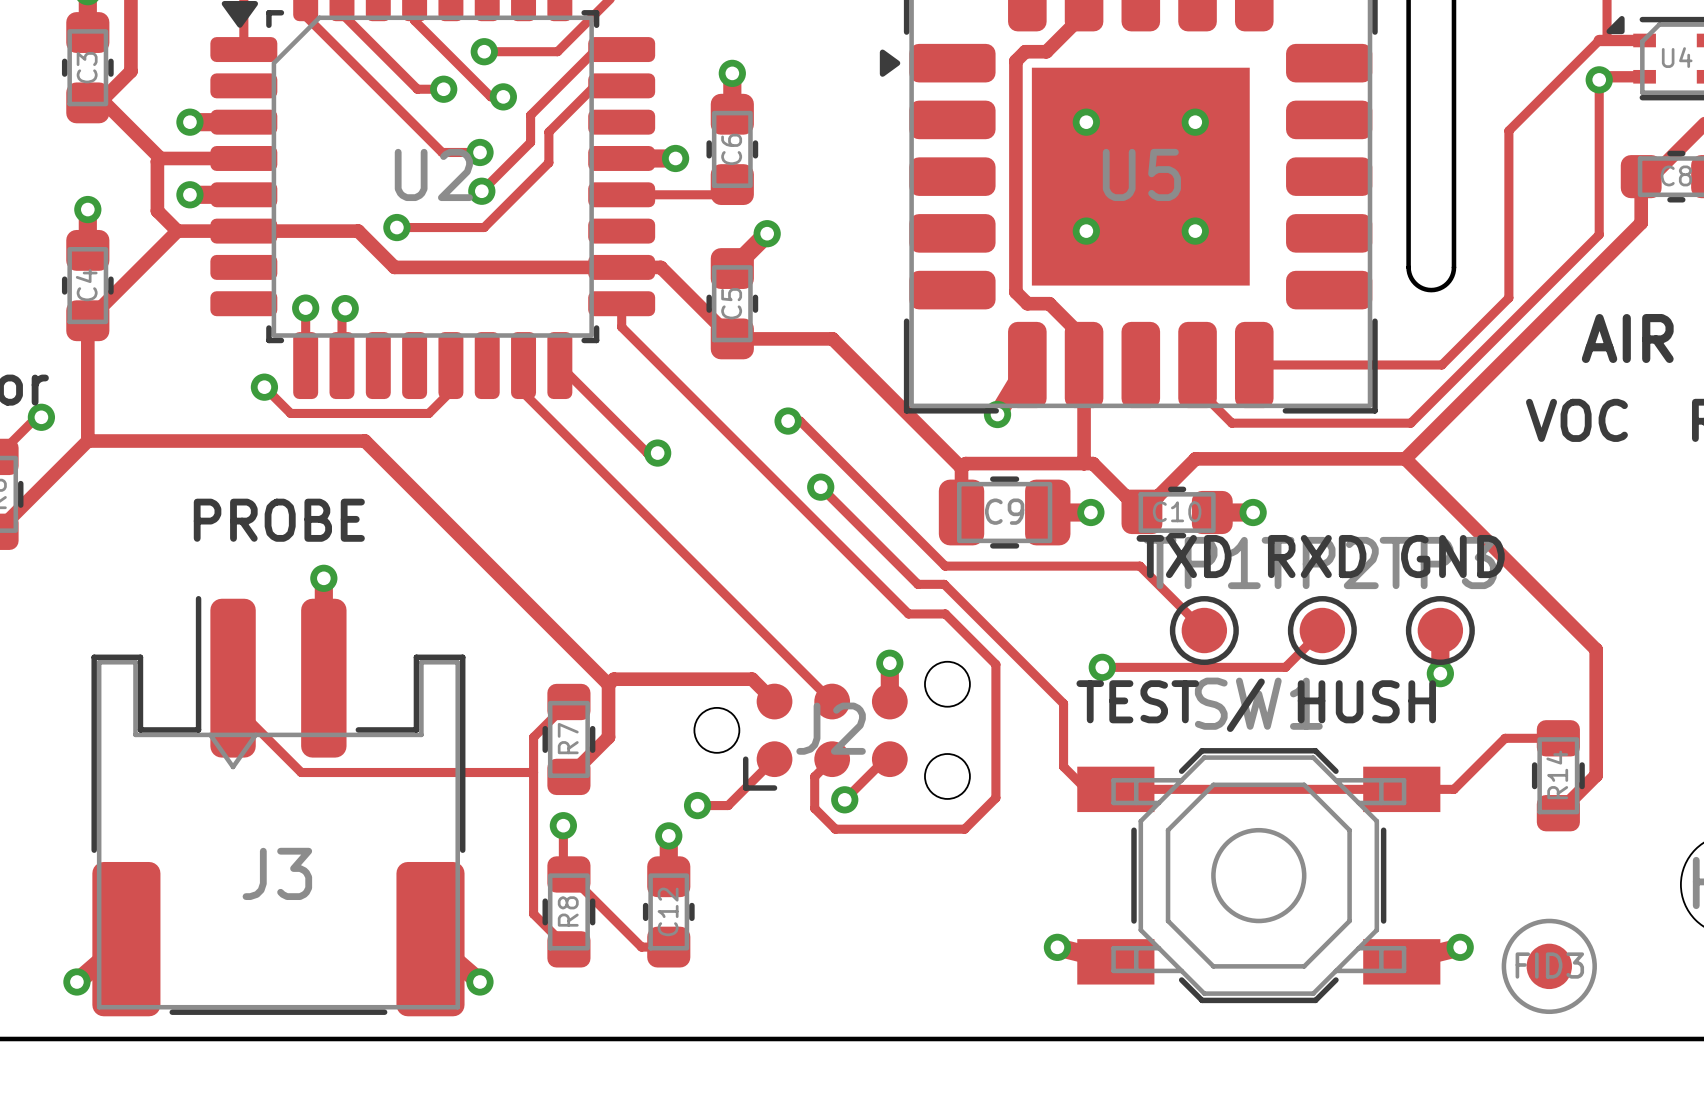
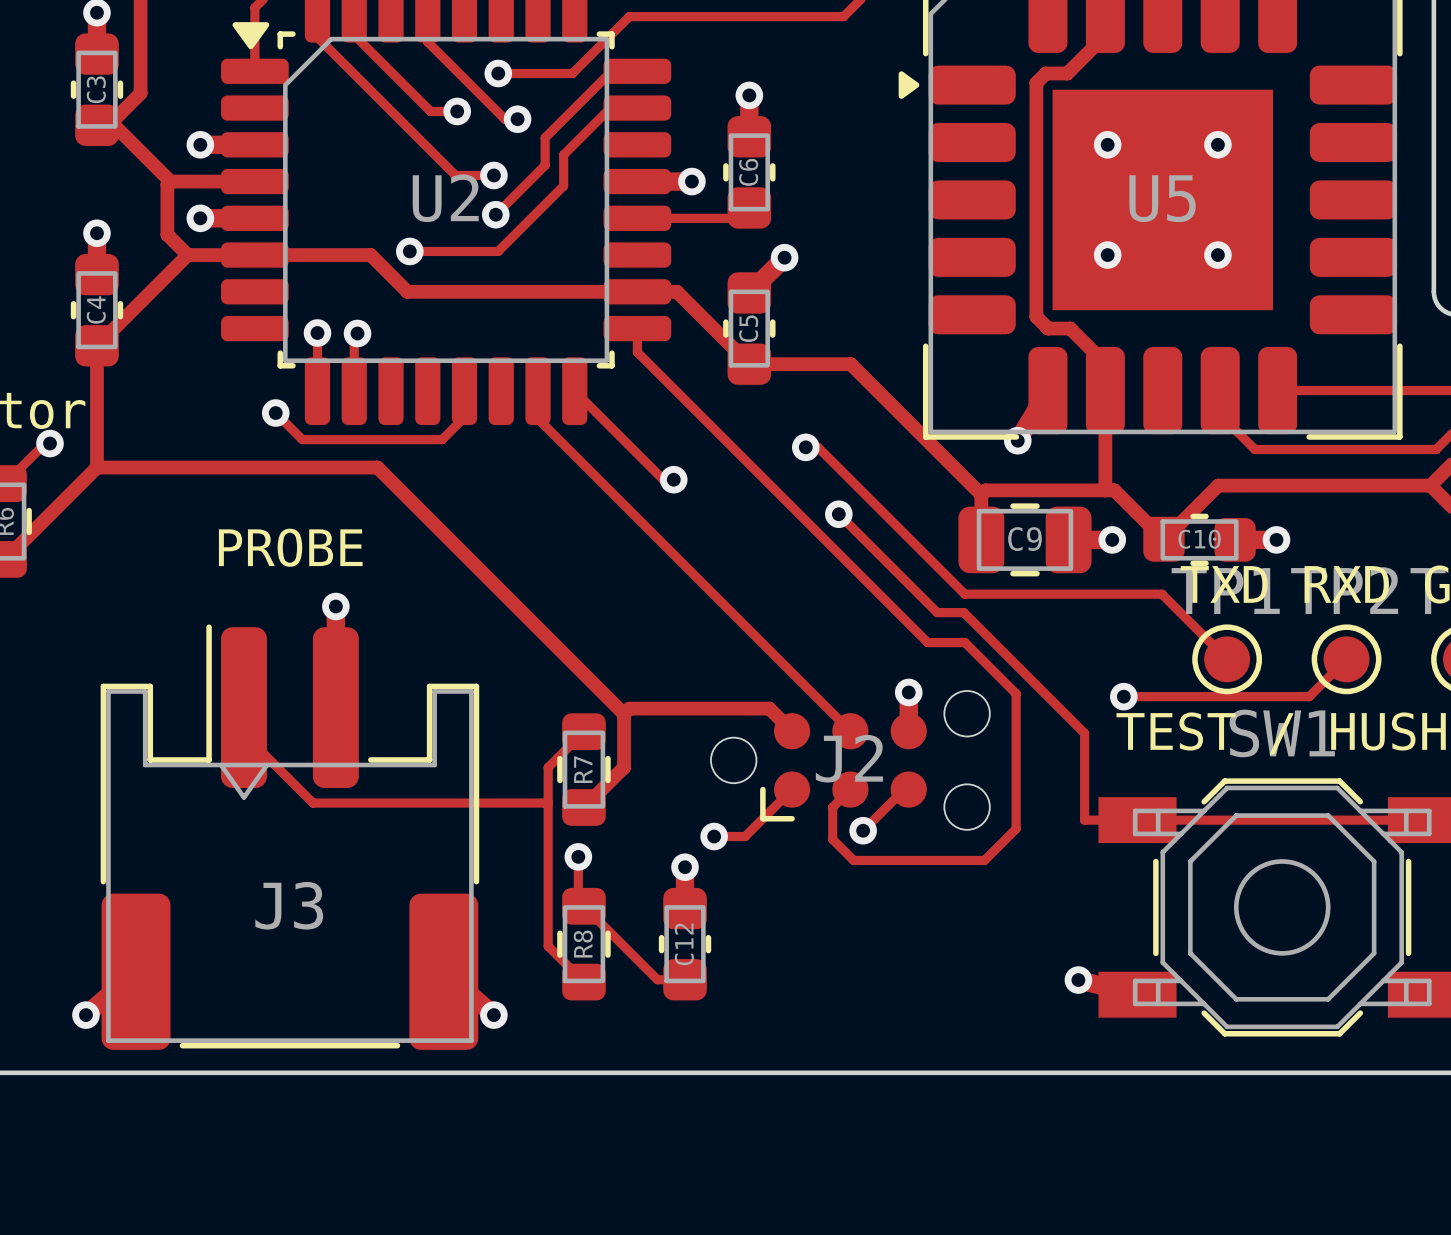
track: (1063, 766) (1086, 789) -> (1084, 797) (1084, 820) (1107, 820)

